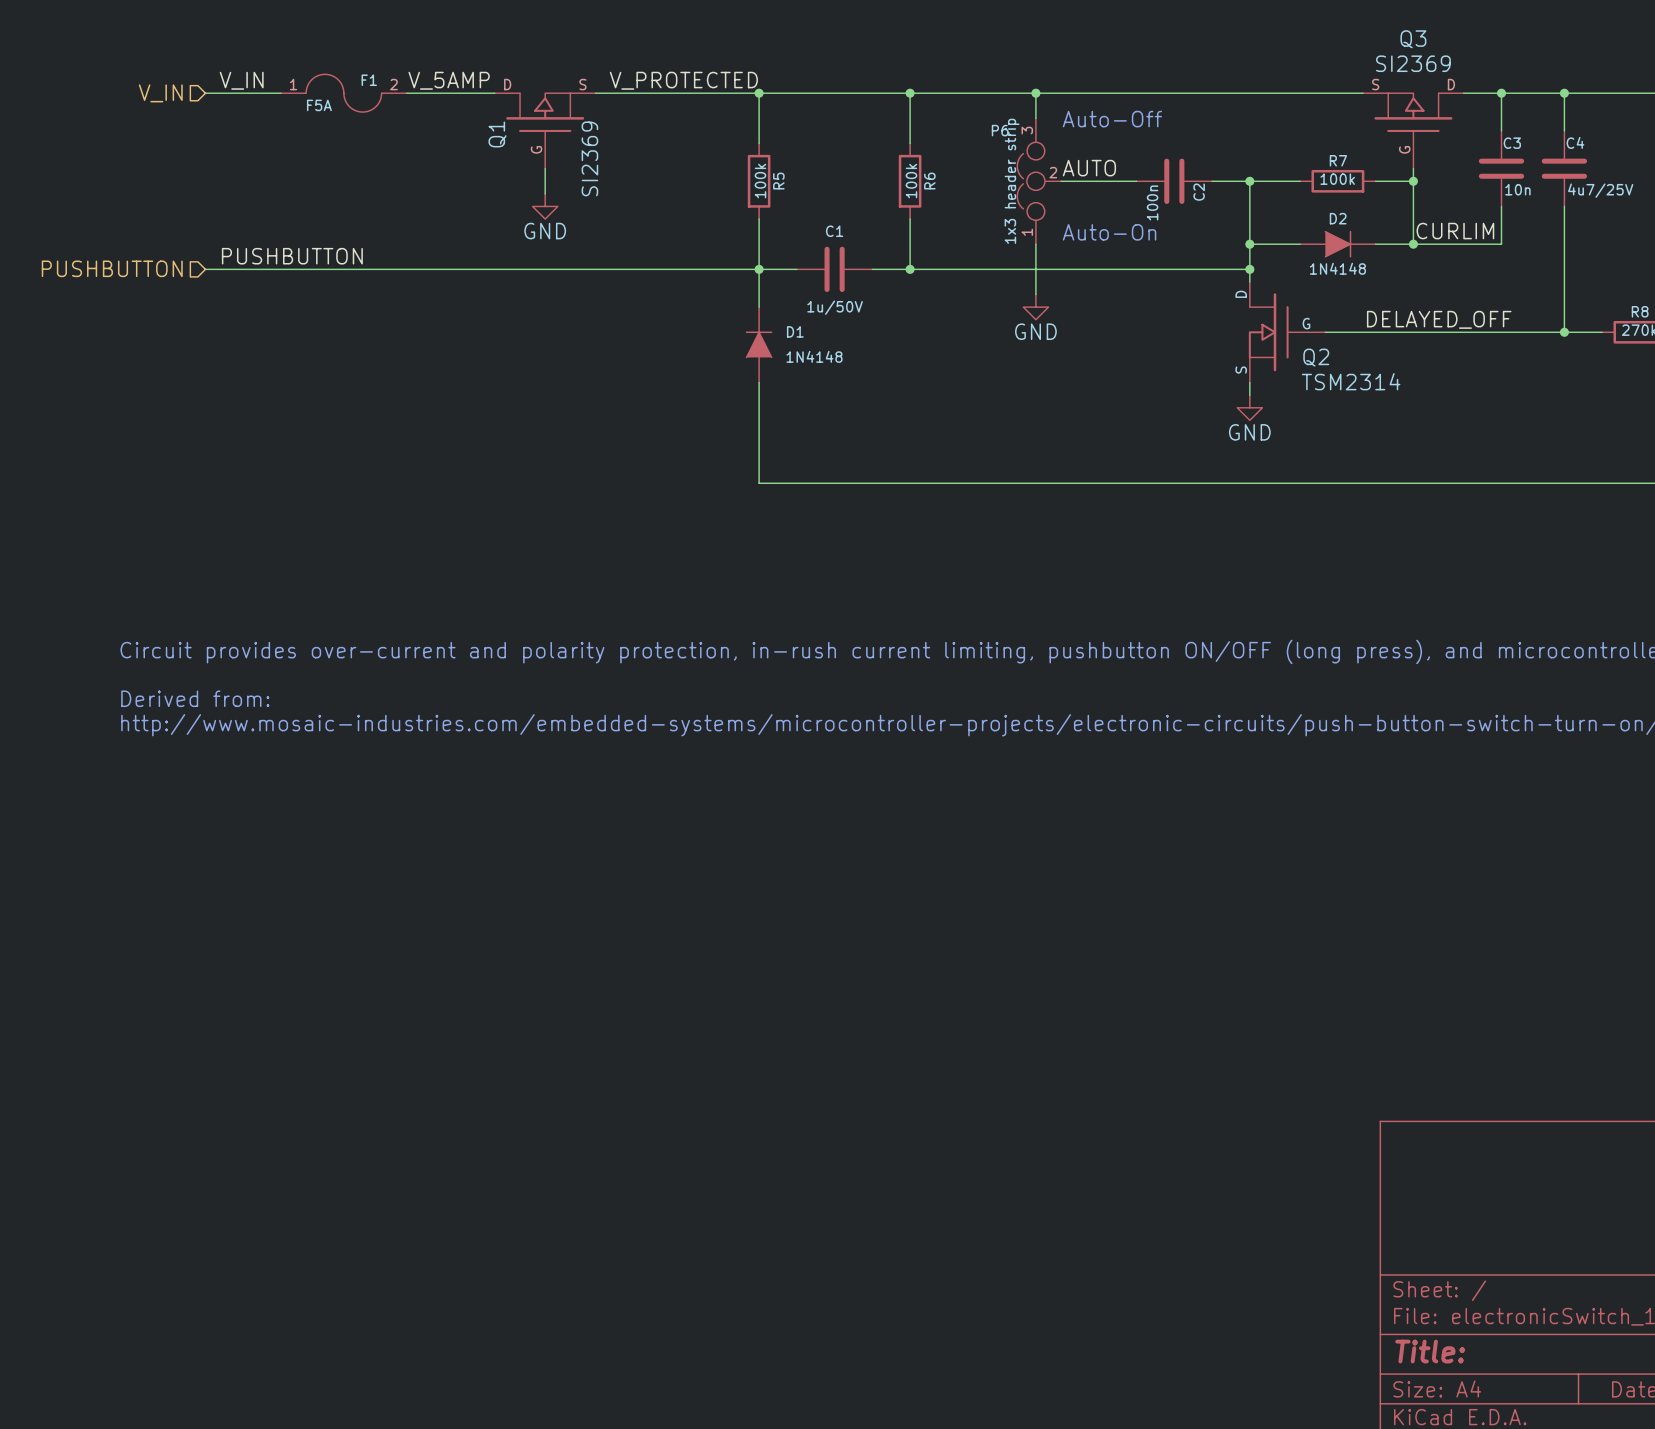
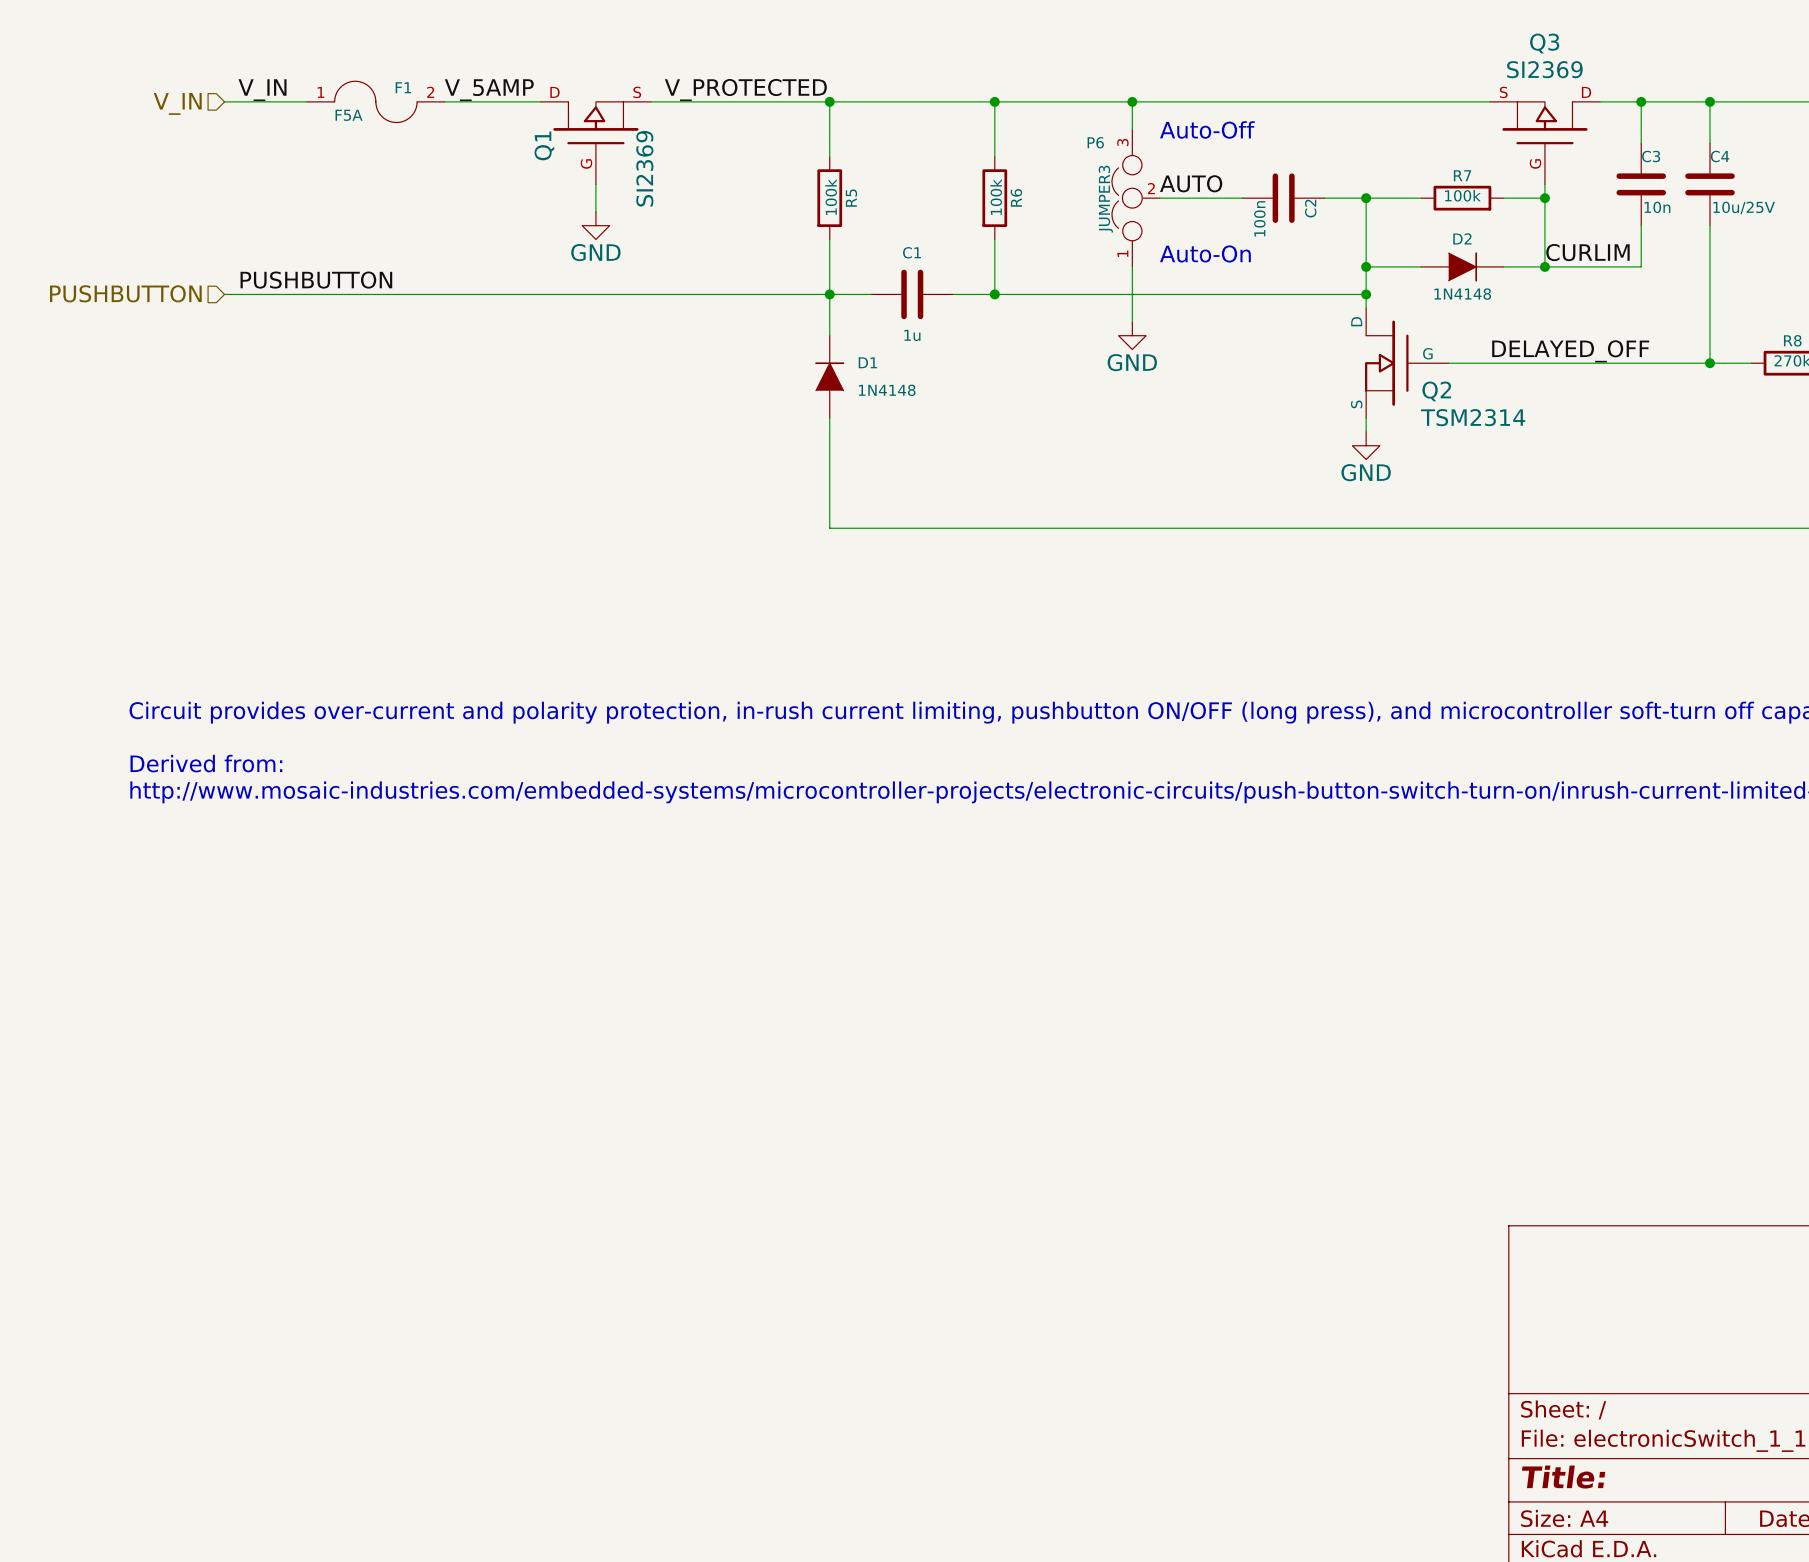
P6 value: 1x3 header strip (1012, 181) -> JUMPER3 (1105, 199)
C4 value: 4u7/25V (1600, 190) -> 10u/25V (1744, 207)
C1 value: 1u/50V (835, 307) -> 1u (912, 335)

